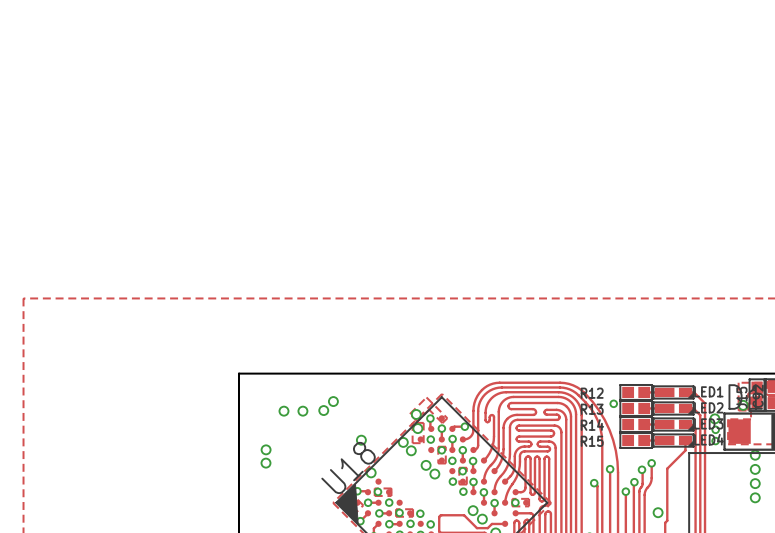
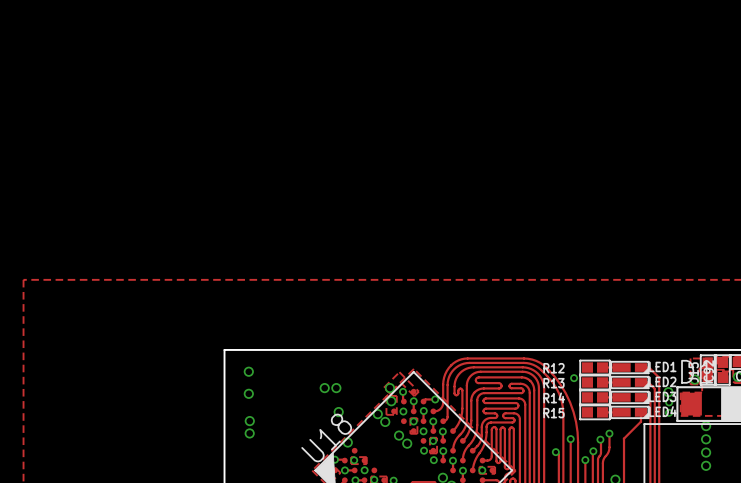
via: none -> (248, 371)
via: (333, 401) -> none
via: (323, 410) -> none
via: (283, 411) -> none
via: (302, 411) -> none
via: none -> (324, 388)
via: none -> (336, 388)
via: none -> (248, 393)

